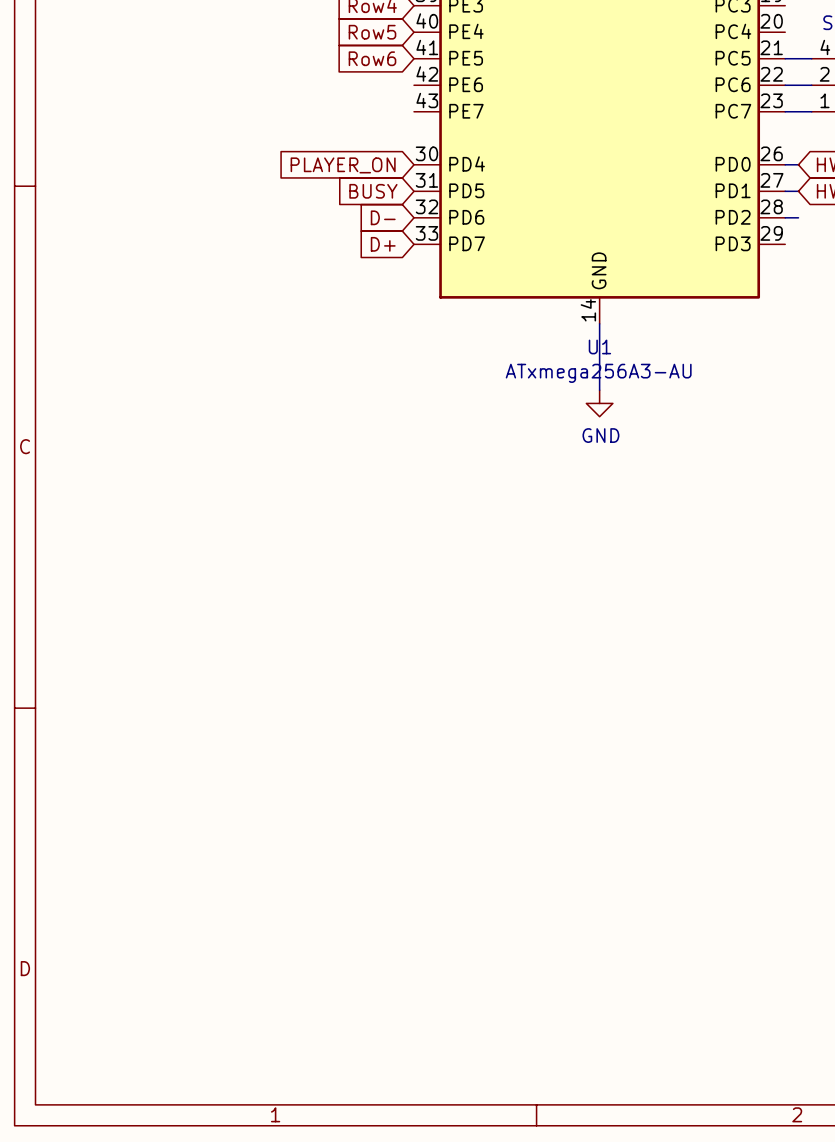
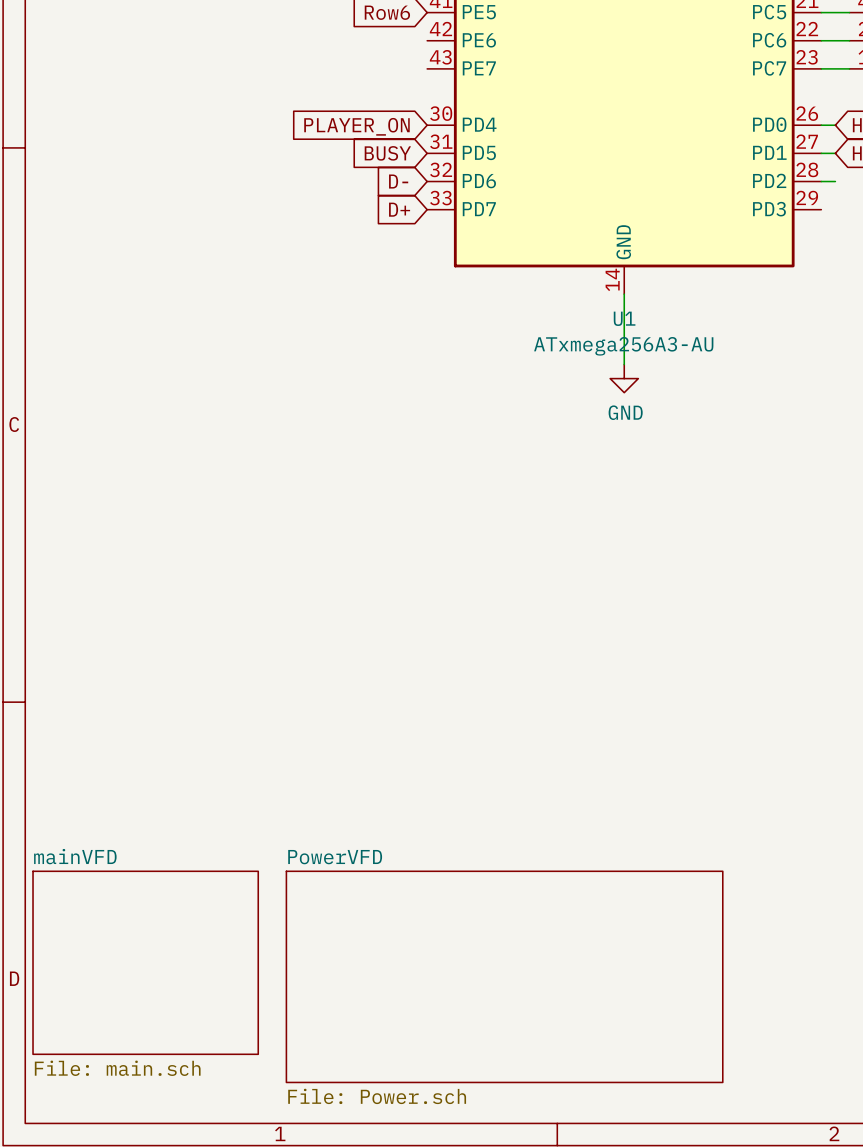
sheet mainVFD: none -> File: main.sch (145, 962)
sheet PowerVFD: none -> File: Power.sch (504, 976)

